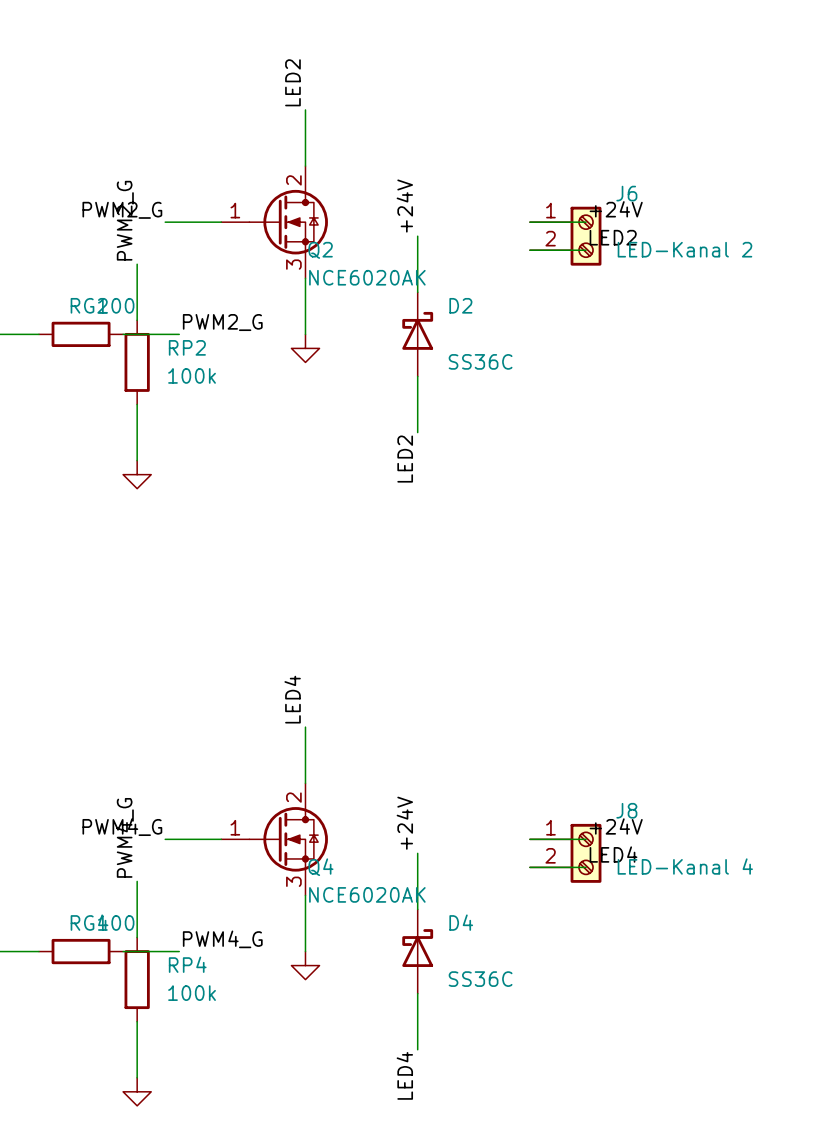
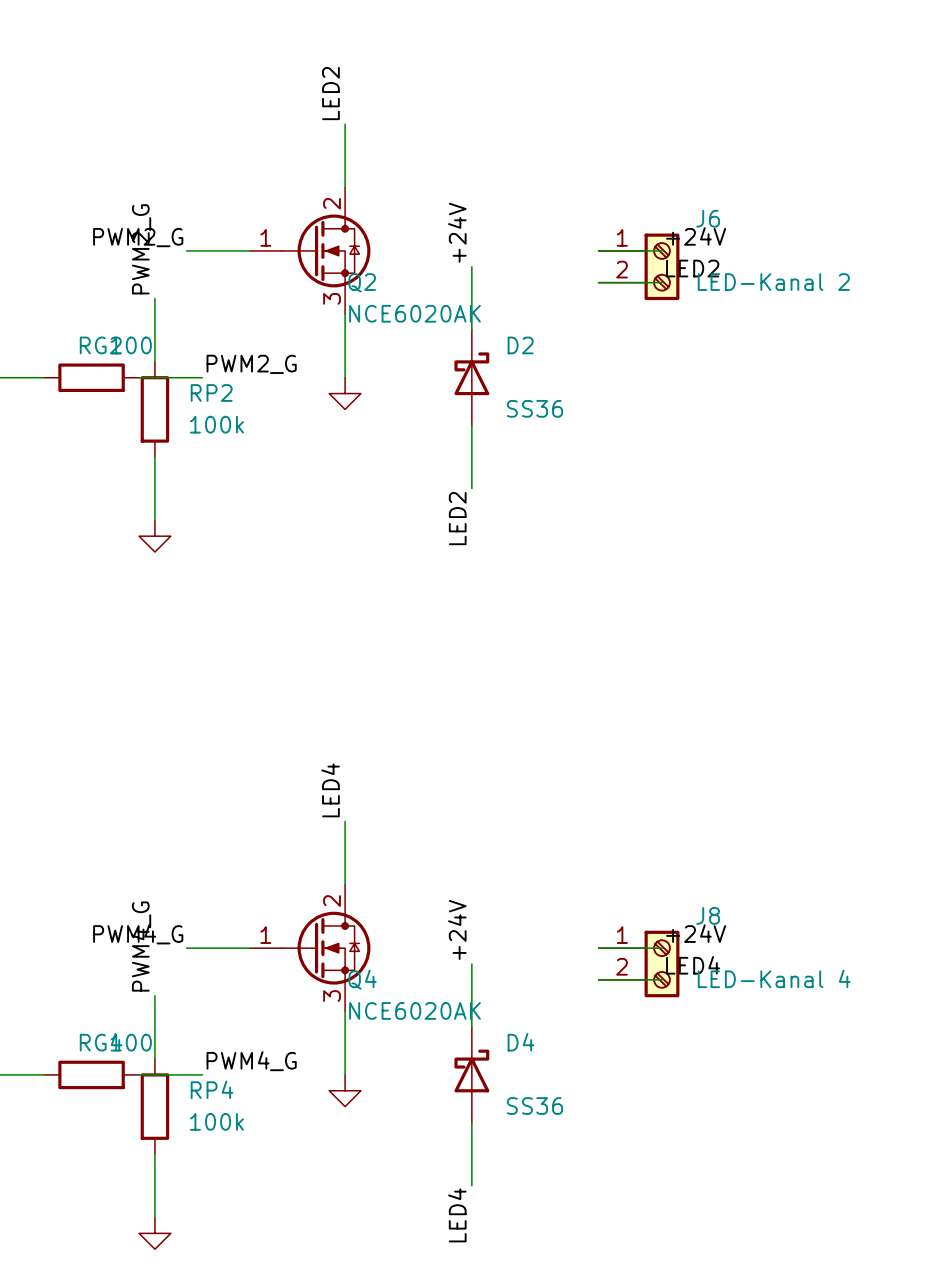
D2 value: SS36C (480, 361) -> SS36 (534, 408)
D4 value: SS36C (480, 979) -> SS36 (534, 1106)

